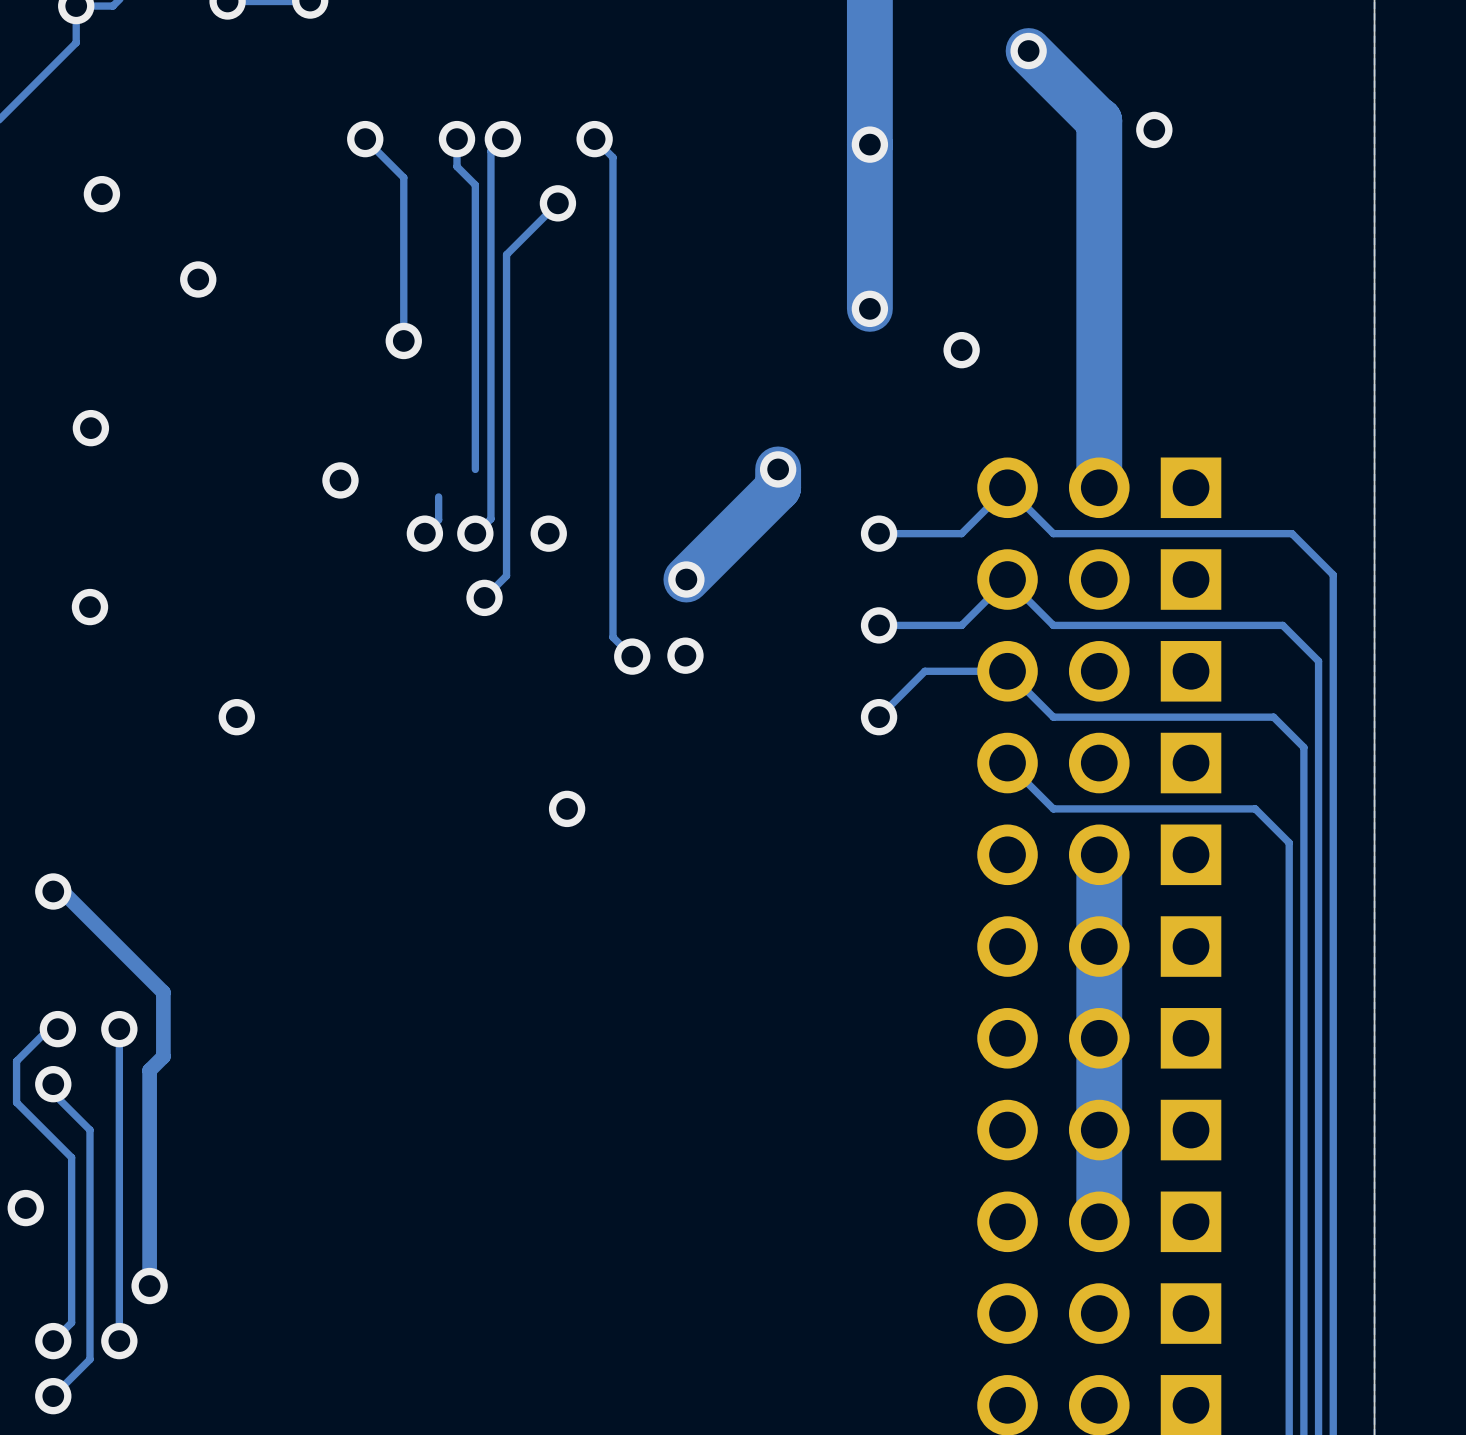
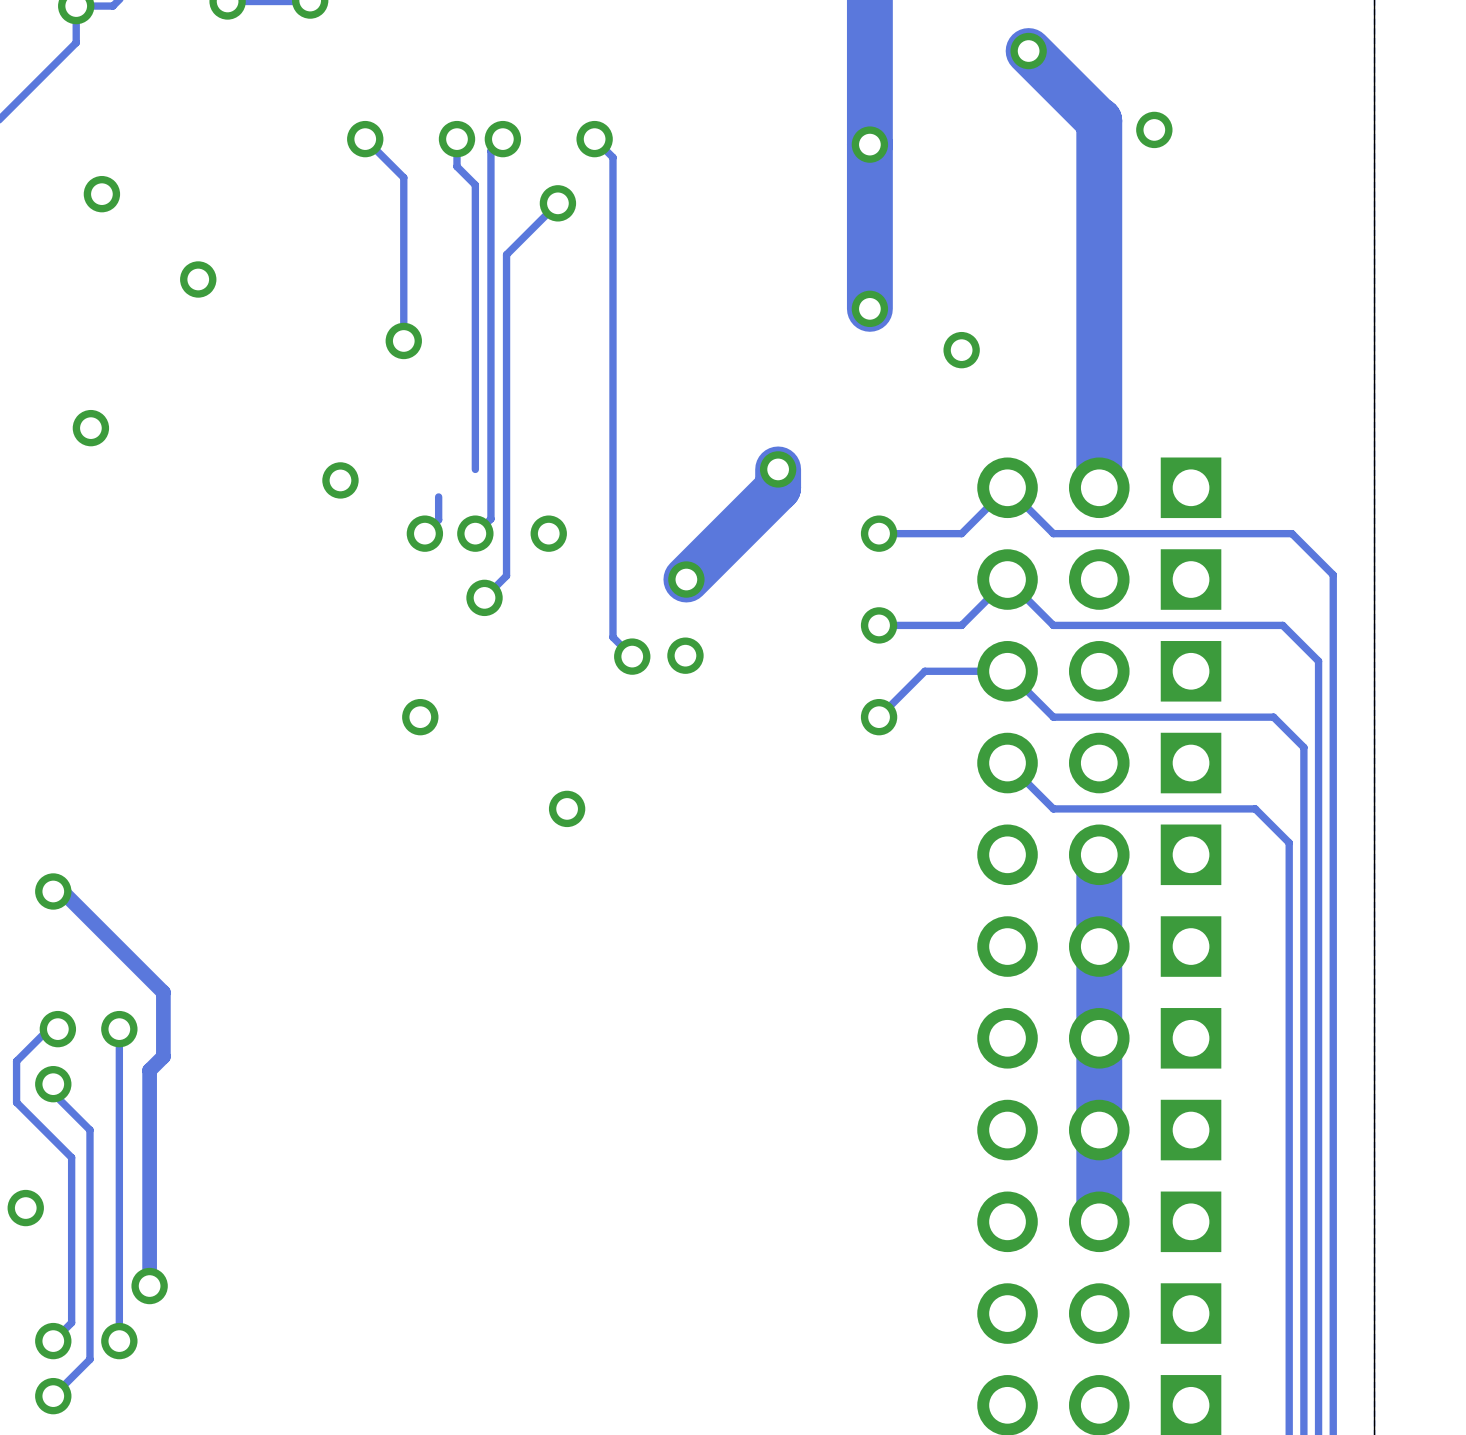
via: (89, 607) -> none
via: (236, 717) -> none
via: none -> (420, 717)

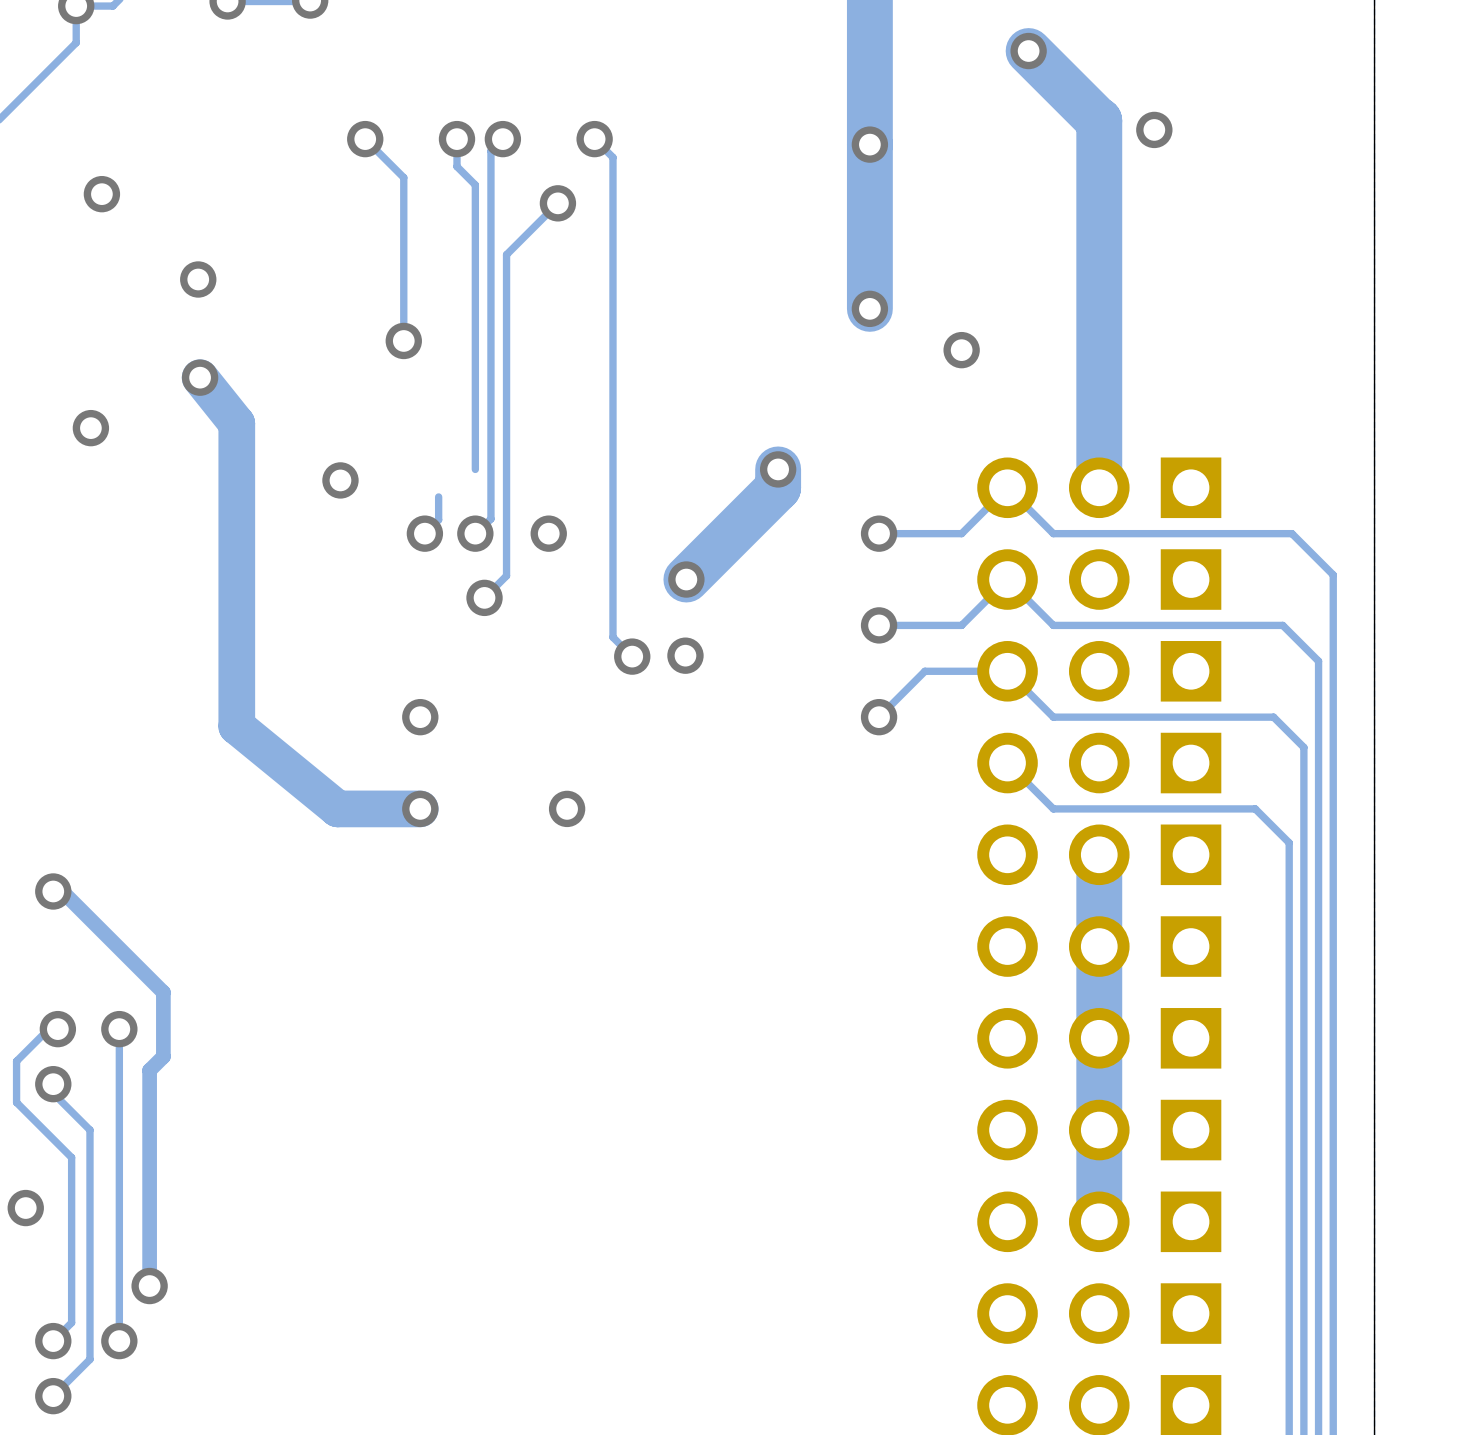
track: none -> (200, 377) (236, 423) (236, 726) (337, 808) (420, 808)
via: none -> (200, 377)
via: none -> (420, 808)

